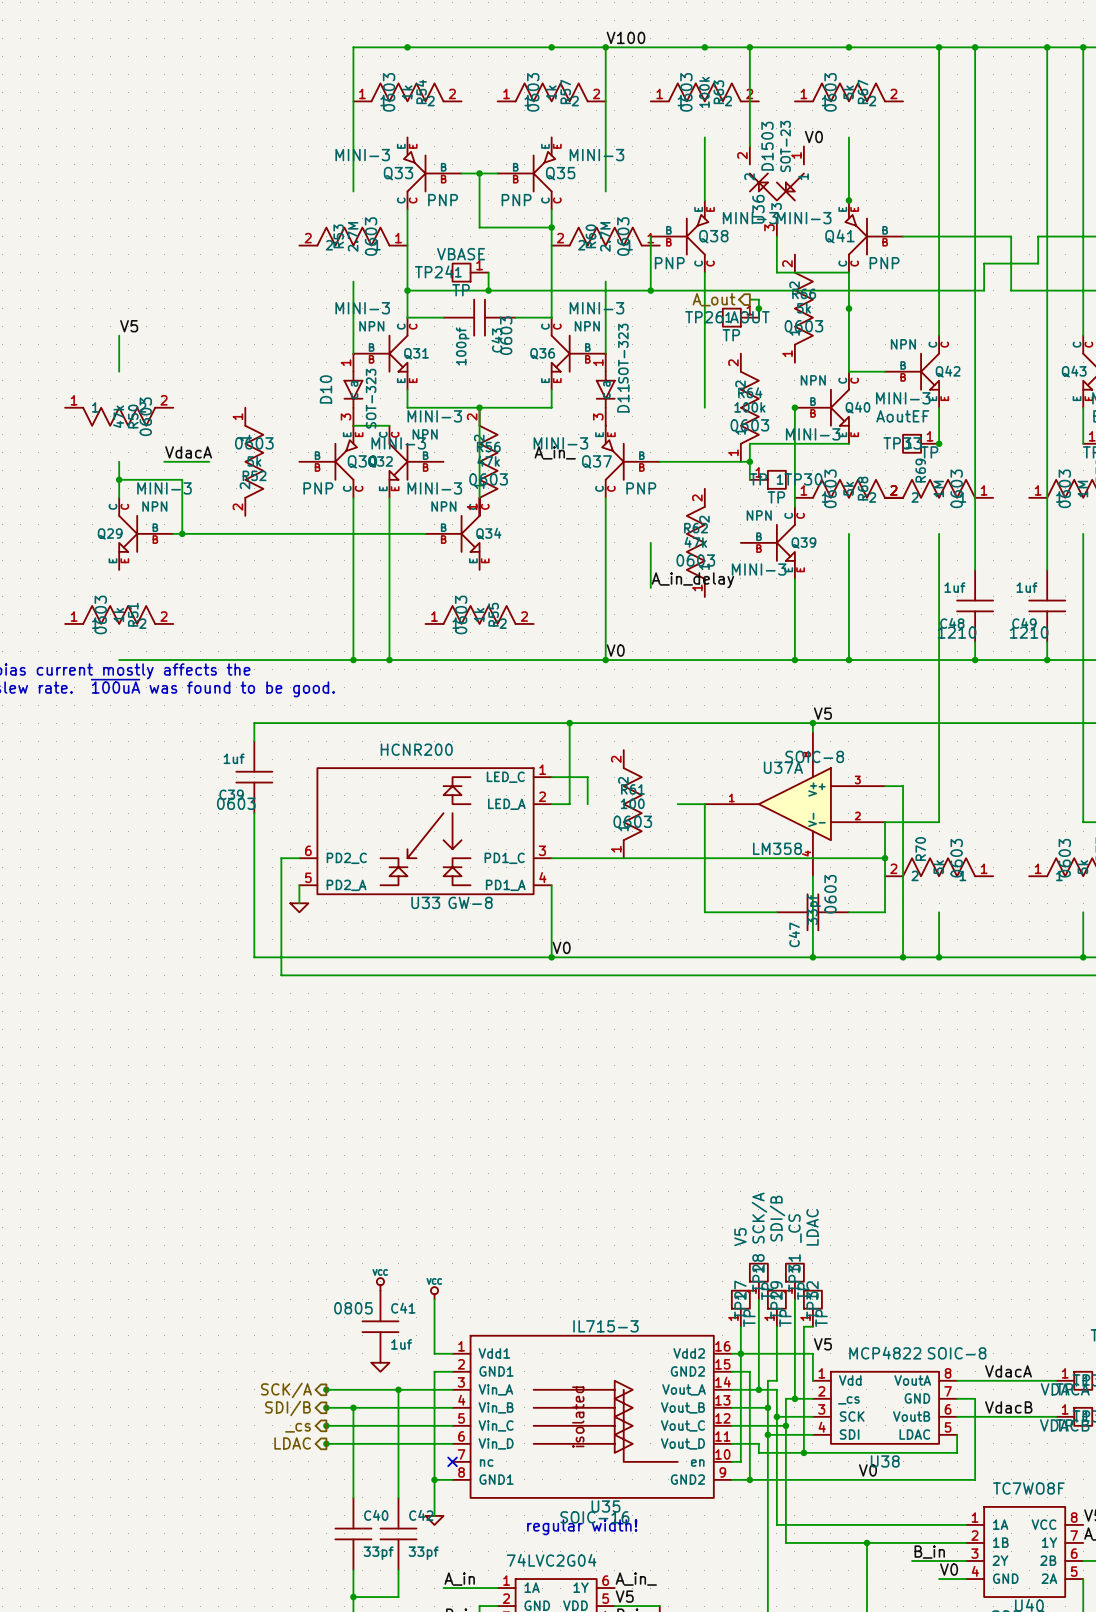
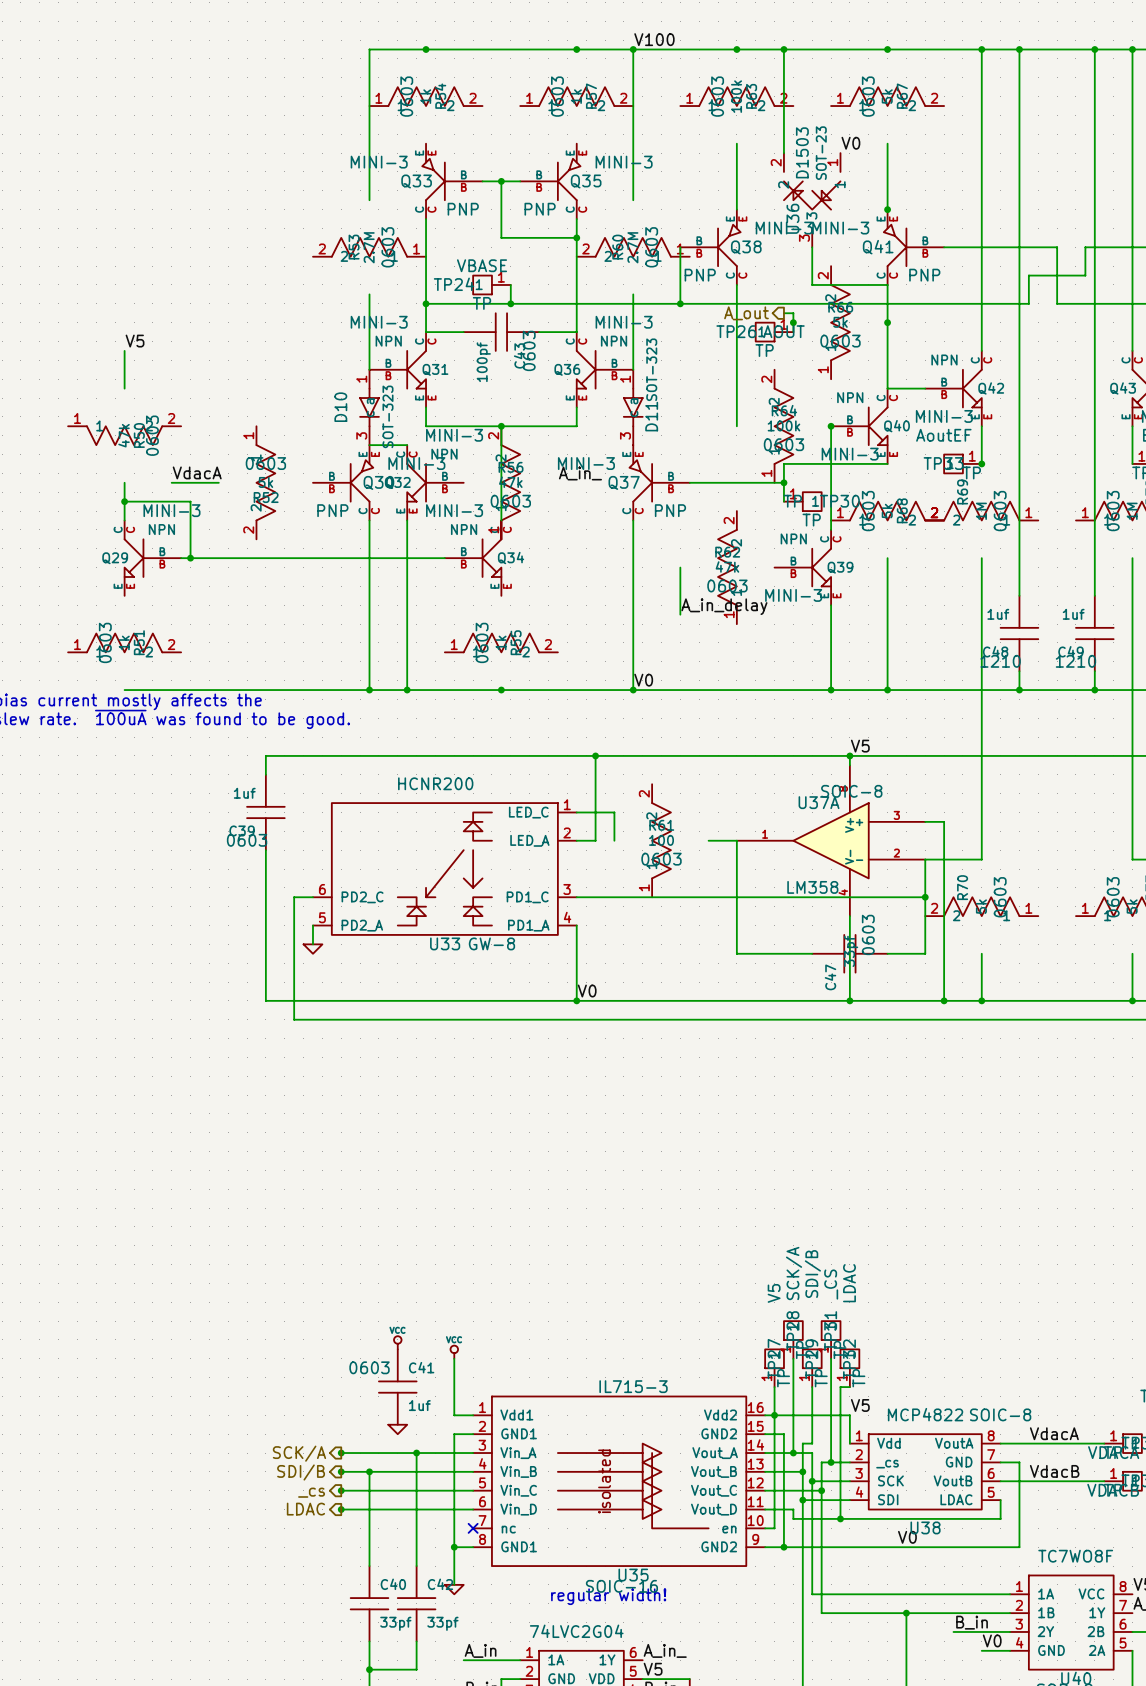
junction: none -> (501, 690)
C41 text: 0805 (353, 1308) -> 0603 (369, 1367)

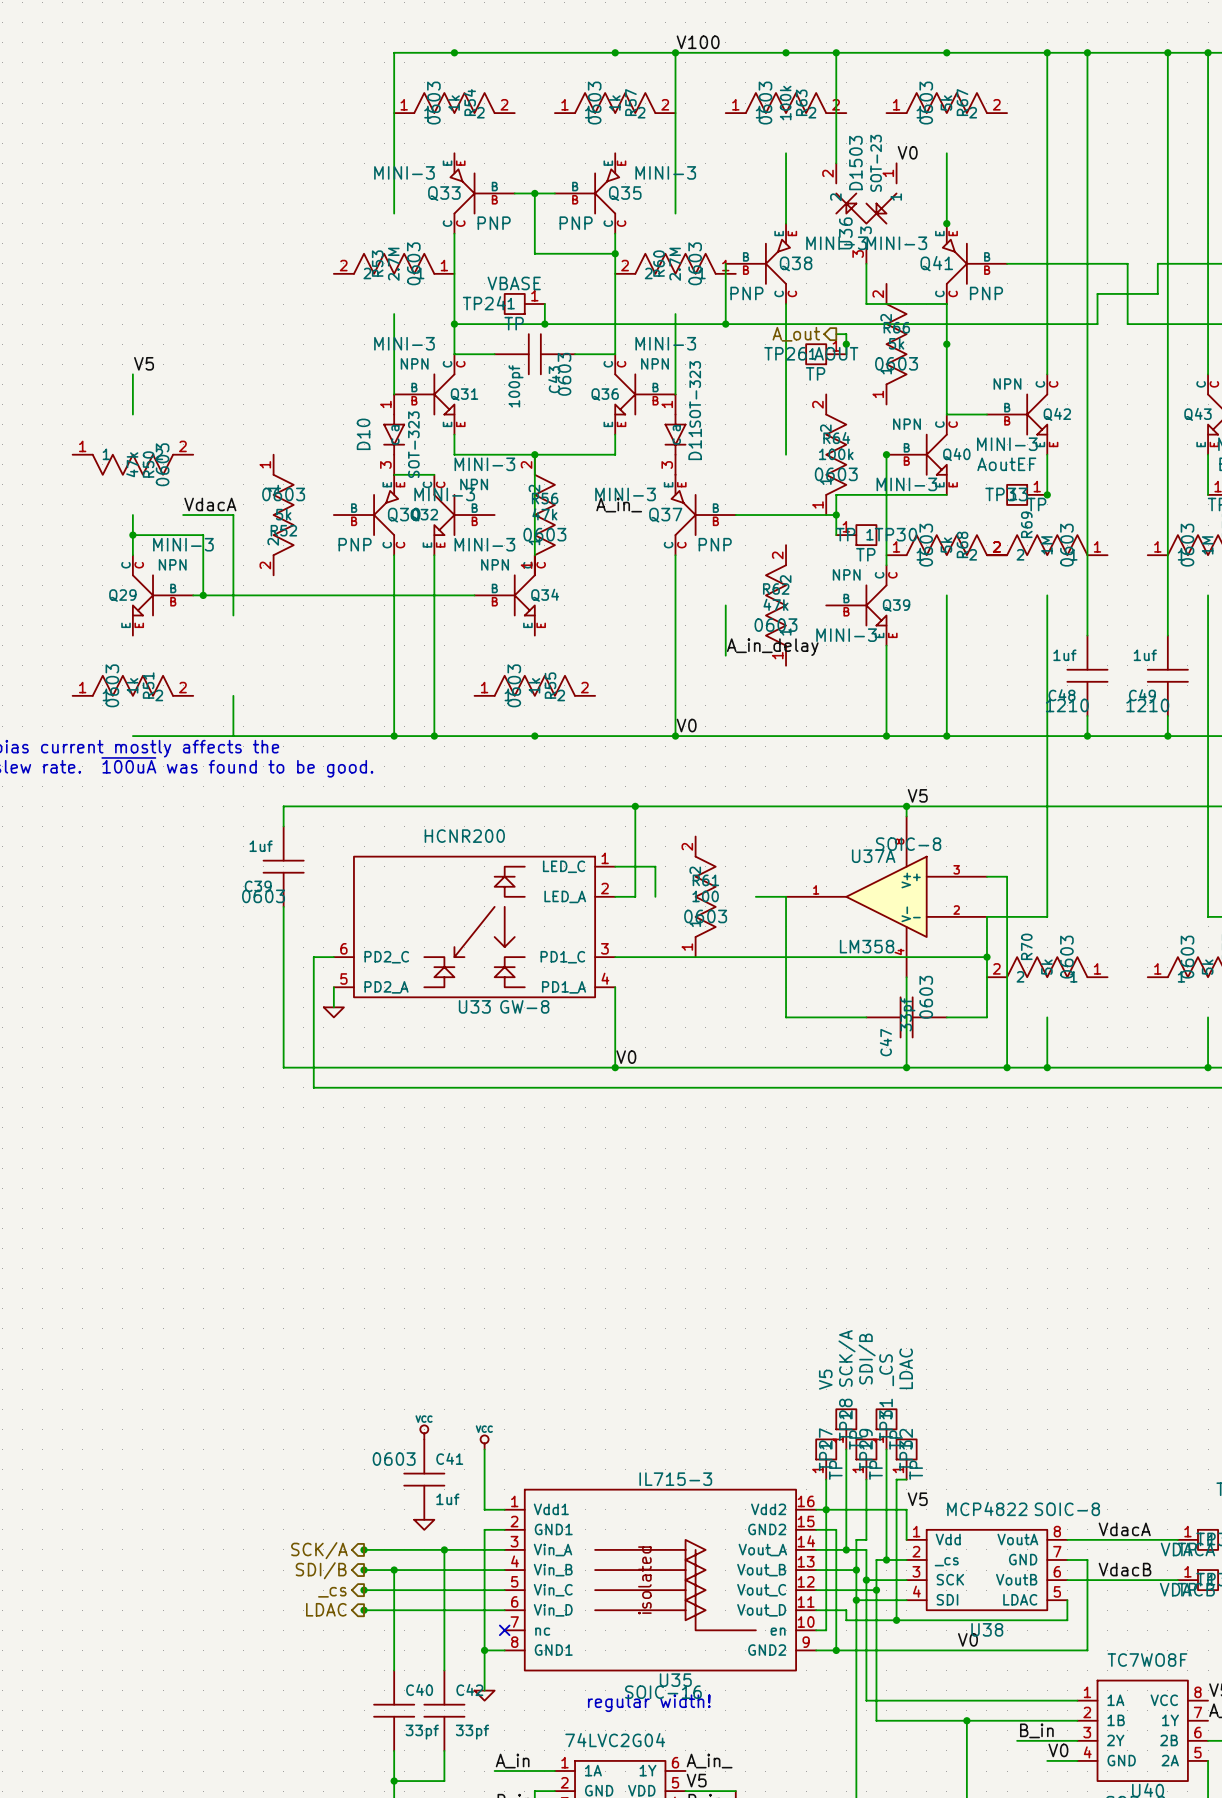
wire: none -> (233, 515) (233, 615)
wire: none -> (233, 695) (233, 736)

